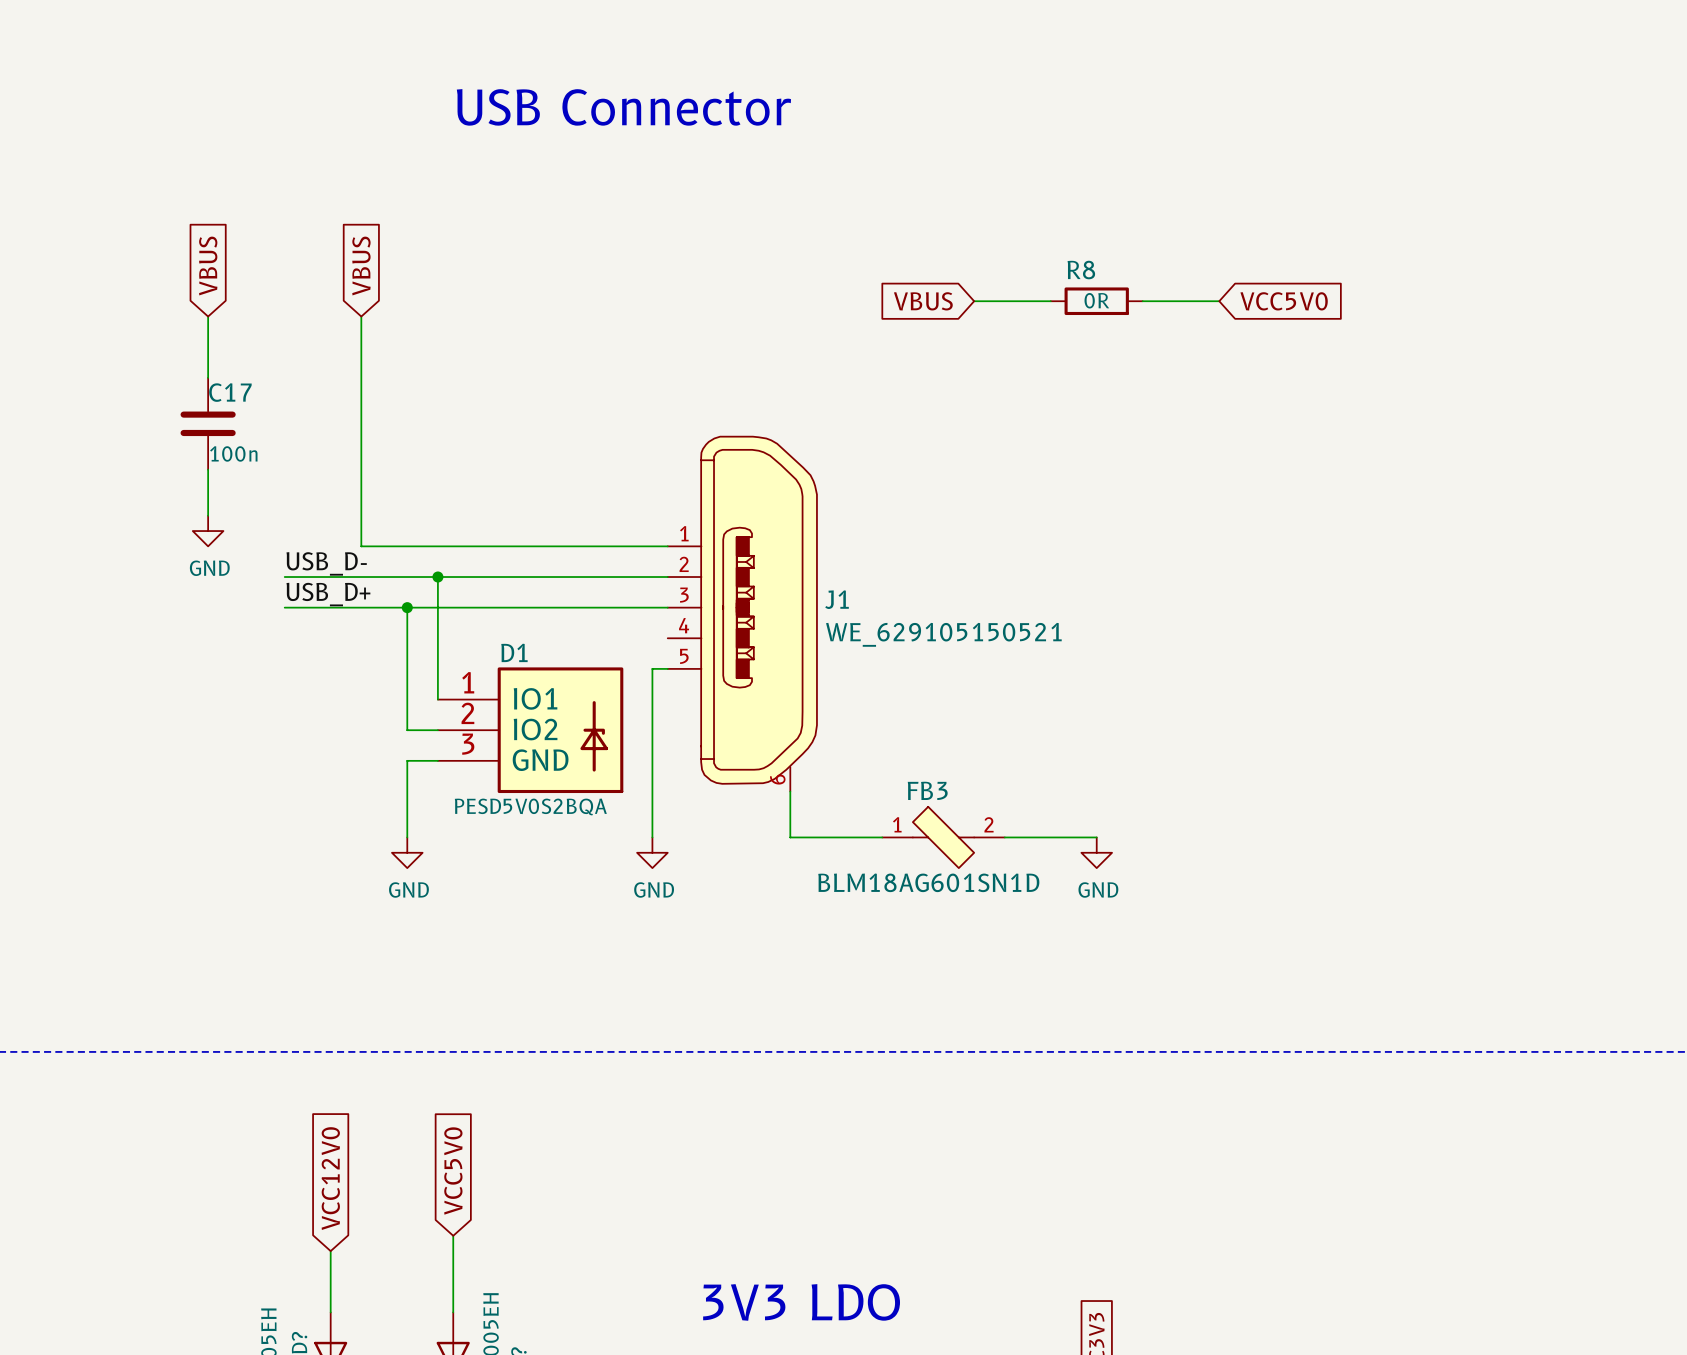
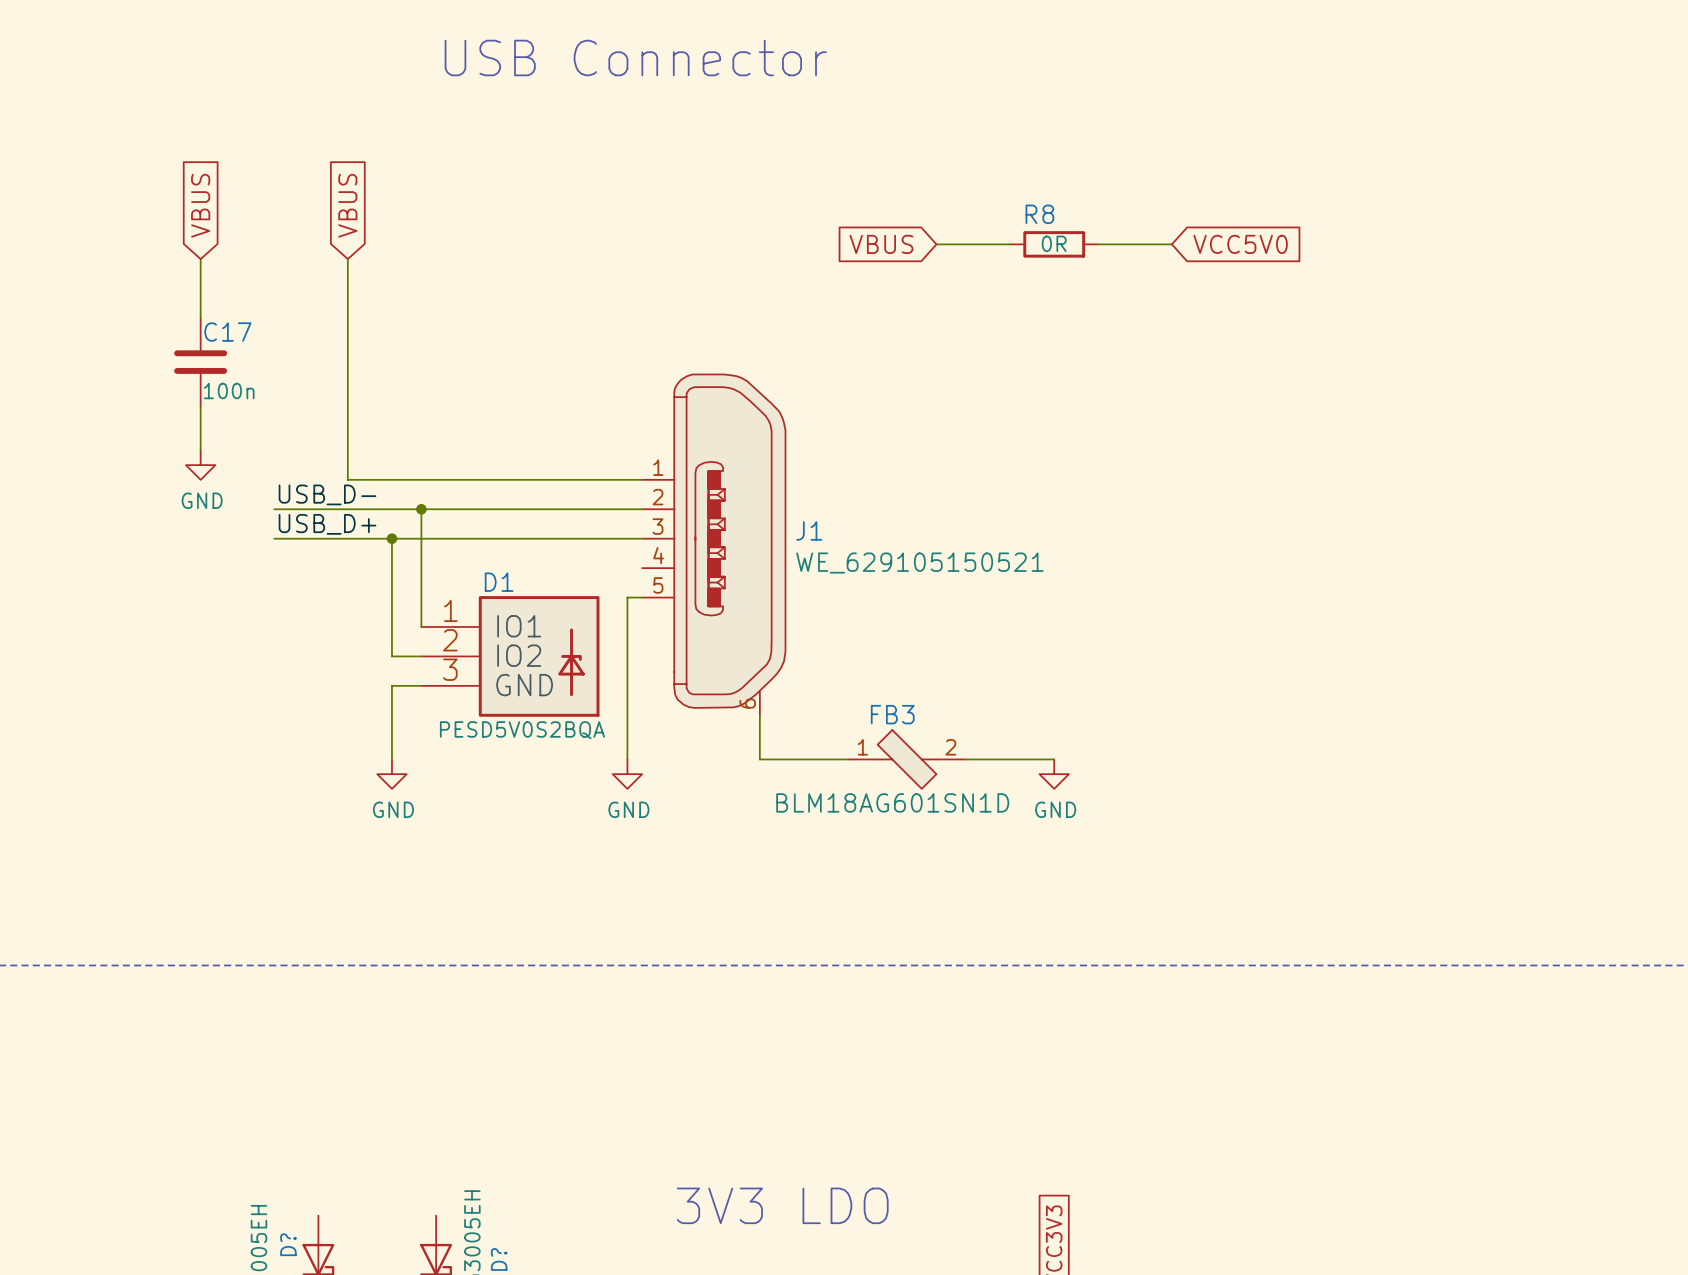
global label: VCC5V0 (453, 1170) -> none
global label: VCC12V0 (330, 1178) -> none
wire: (453, 1235) (453, 1312) -> none
wire: (330, 1251) (330, 1312) -> none

